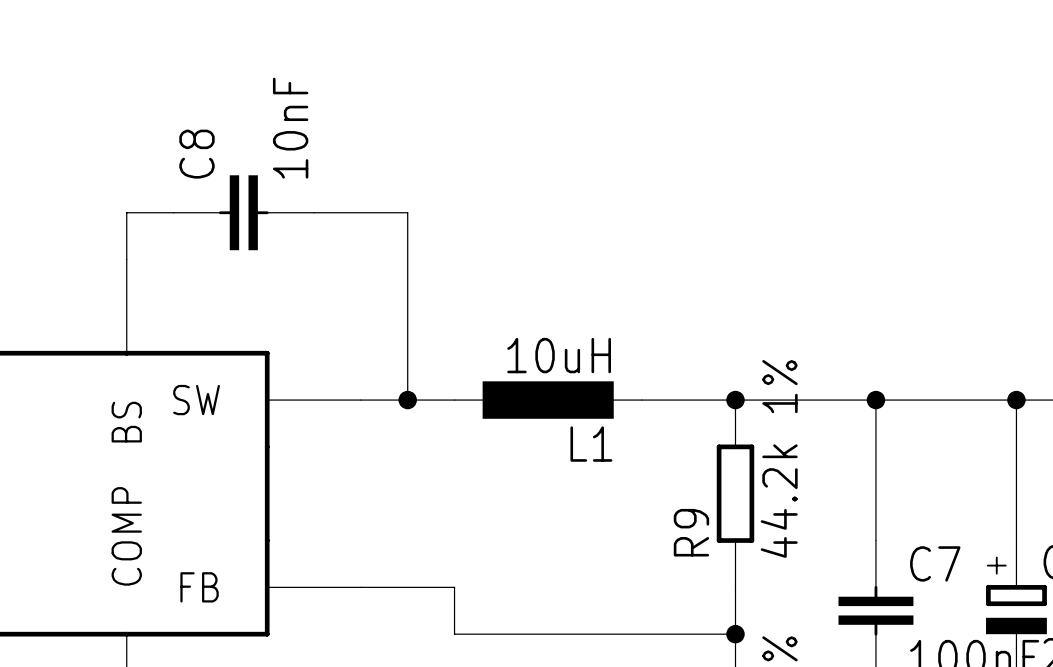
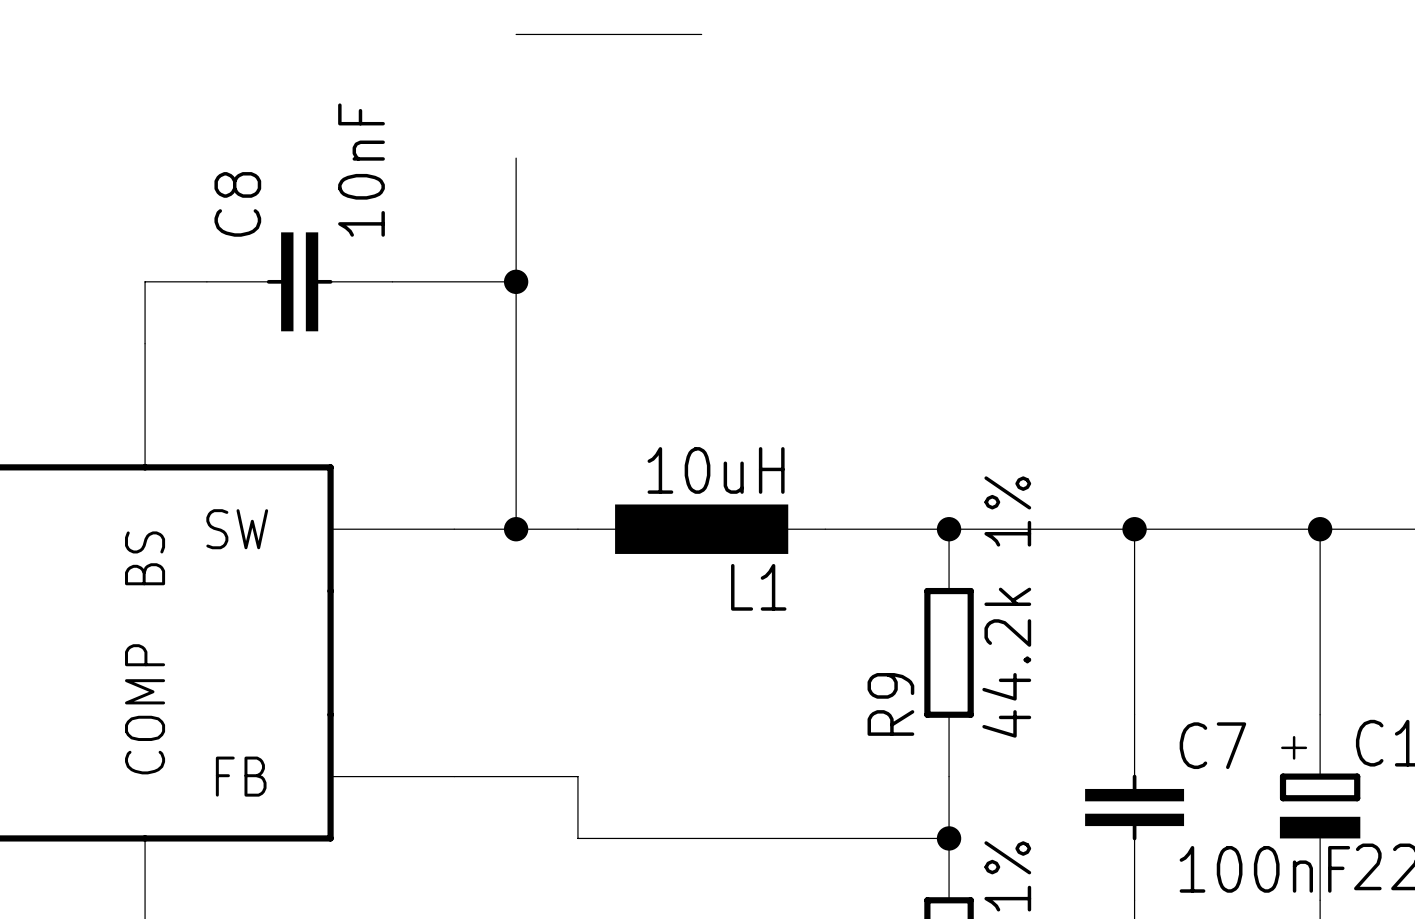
wire: none -> (516, 34) (701, 34)
wire: none -> (516, 158) (516, 281)
junction: none -> (516, 281)

